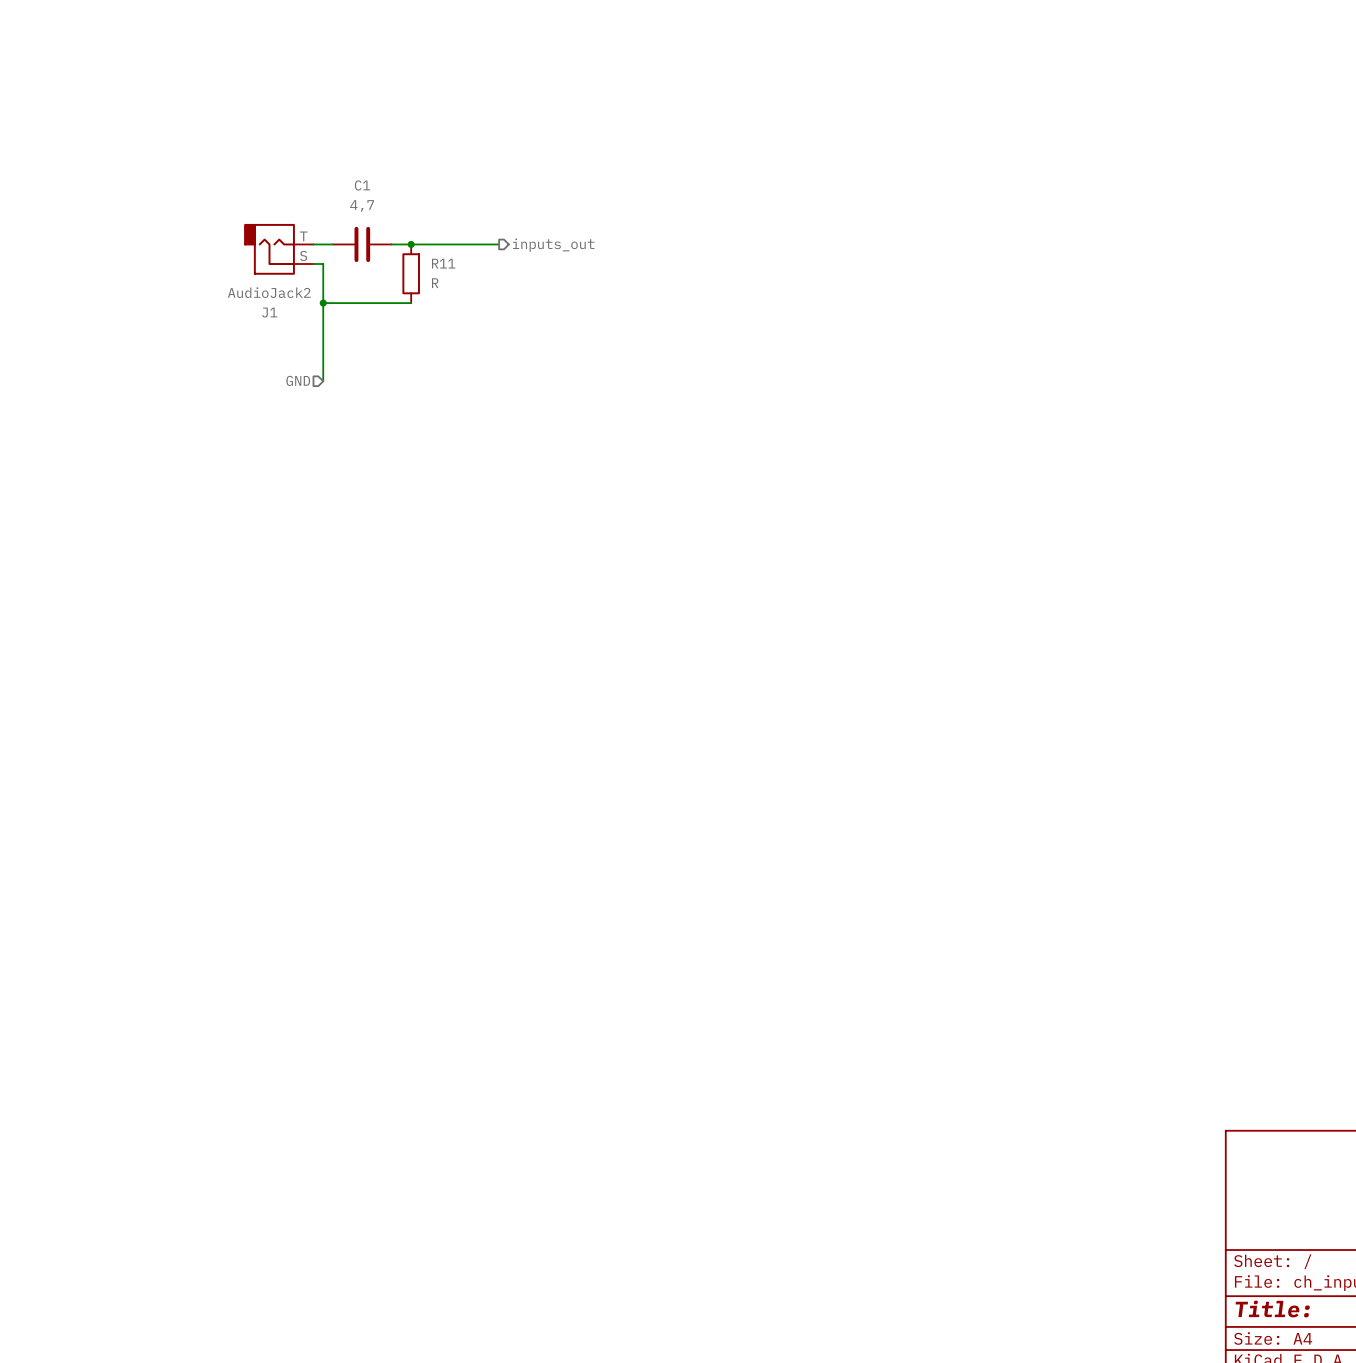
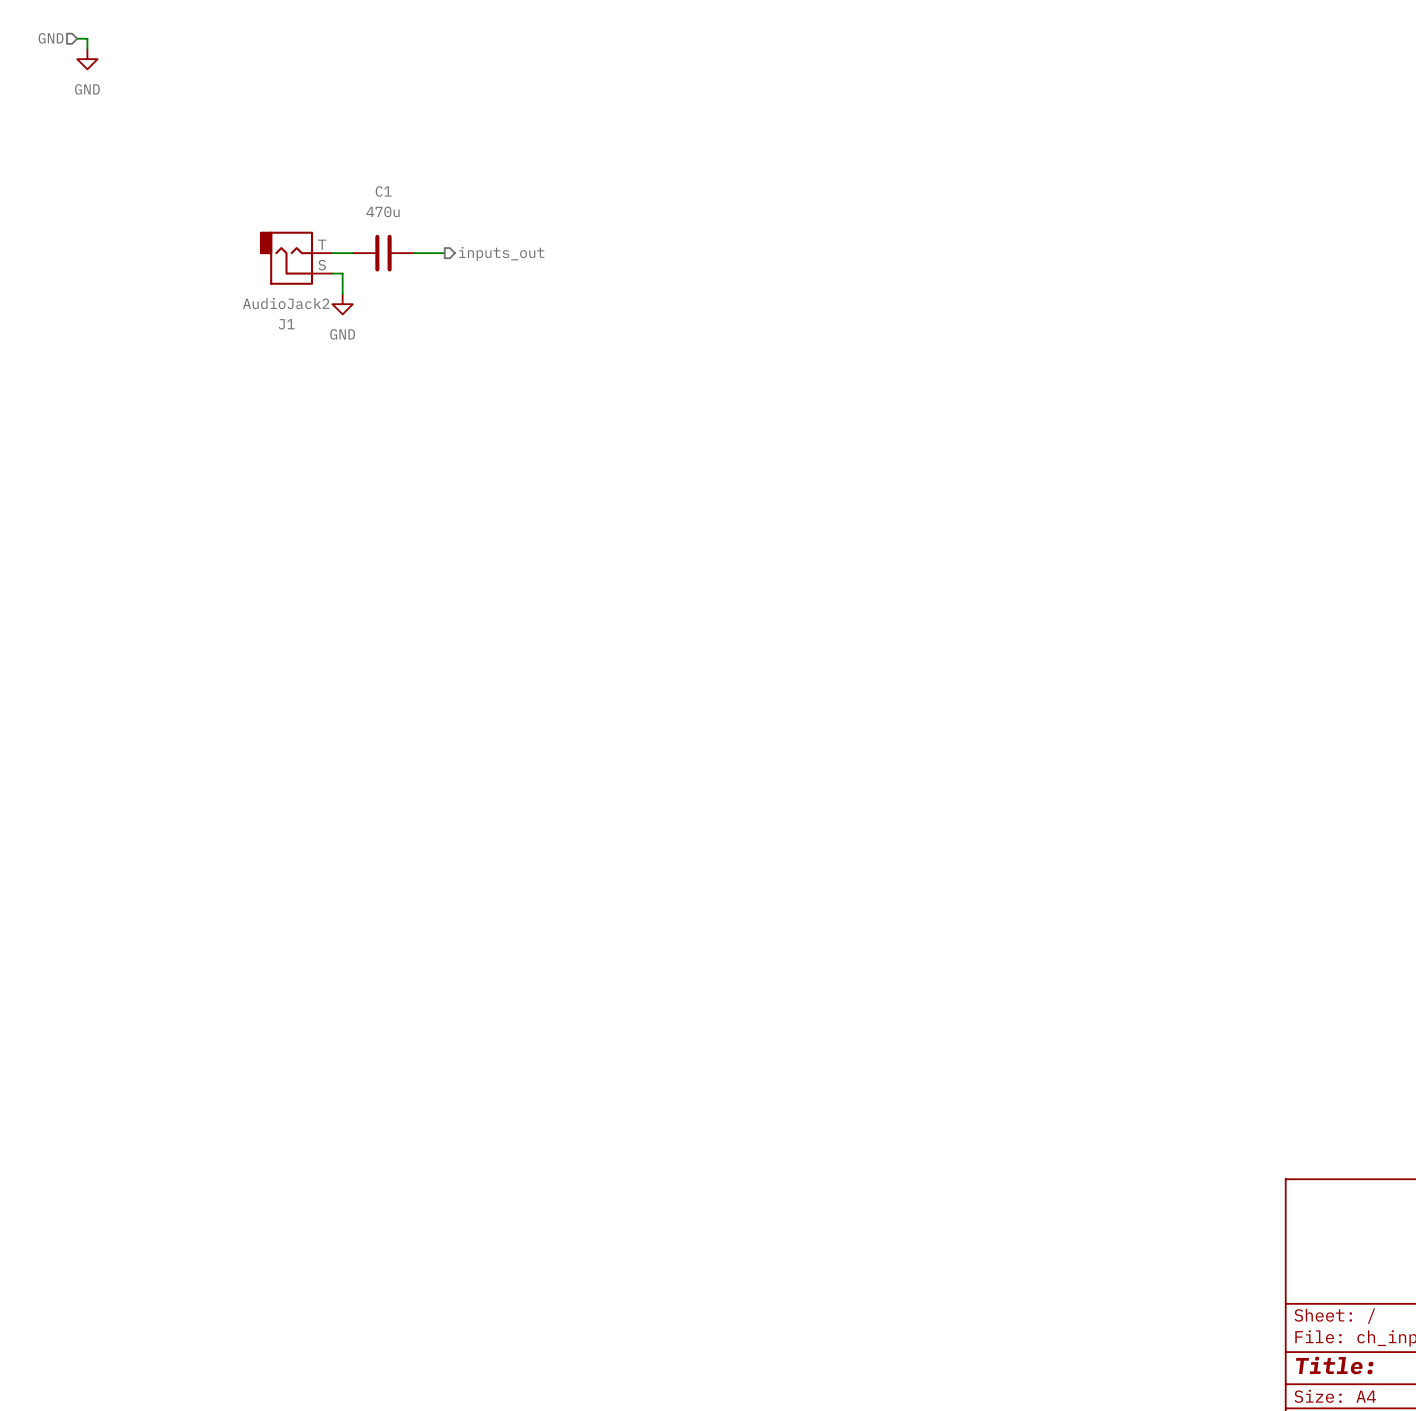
hierarchical label: none -> GND (51, 38)
wire: none -> (77, 38) (87, 38) (87, 48)
power symbol: none -> GND (87, 59)
C1 value: 4,7 (362, 206) -> 470u (383, 211)
junction: (411, 244) -> none
wire: (420, 244) (499, 244) -> none
hierarchical label position: inputs_out (553, 245) -> inputs_out (501, 253)
R11: R (411, 273) -> none
wire: (323, 283) (323, 381) -> none
power symbol: none -> GND (342, 304)
wire: (323, 303) (411, 303) -> none
junction: (323, 303) -> none
hierarchical label: GND (298, 380) -> none

